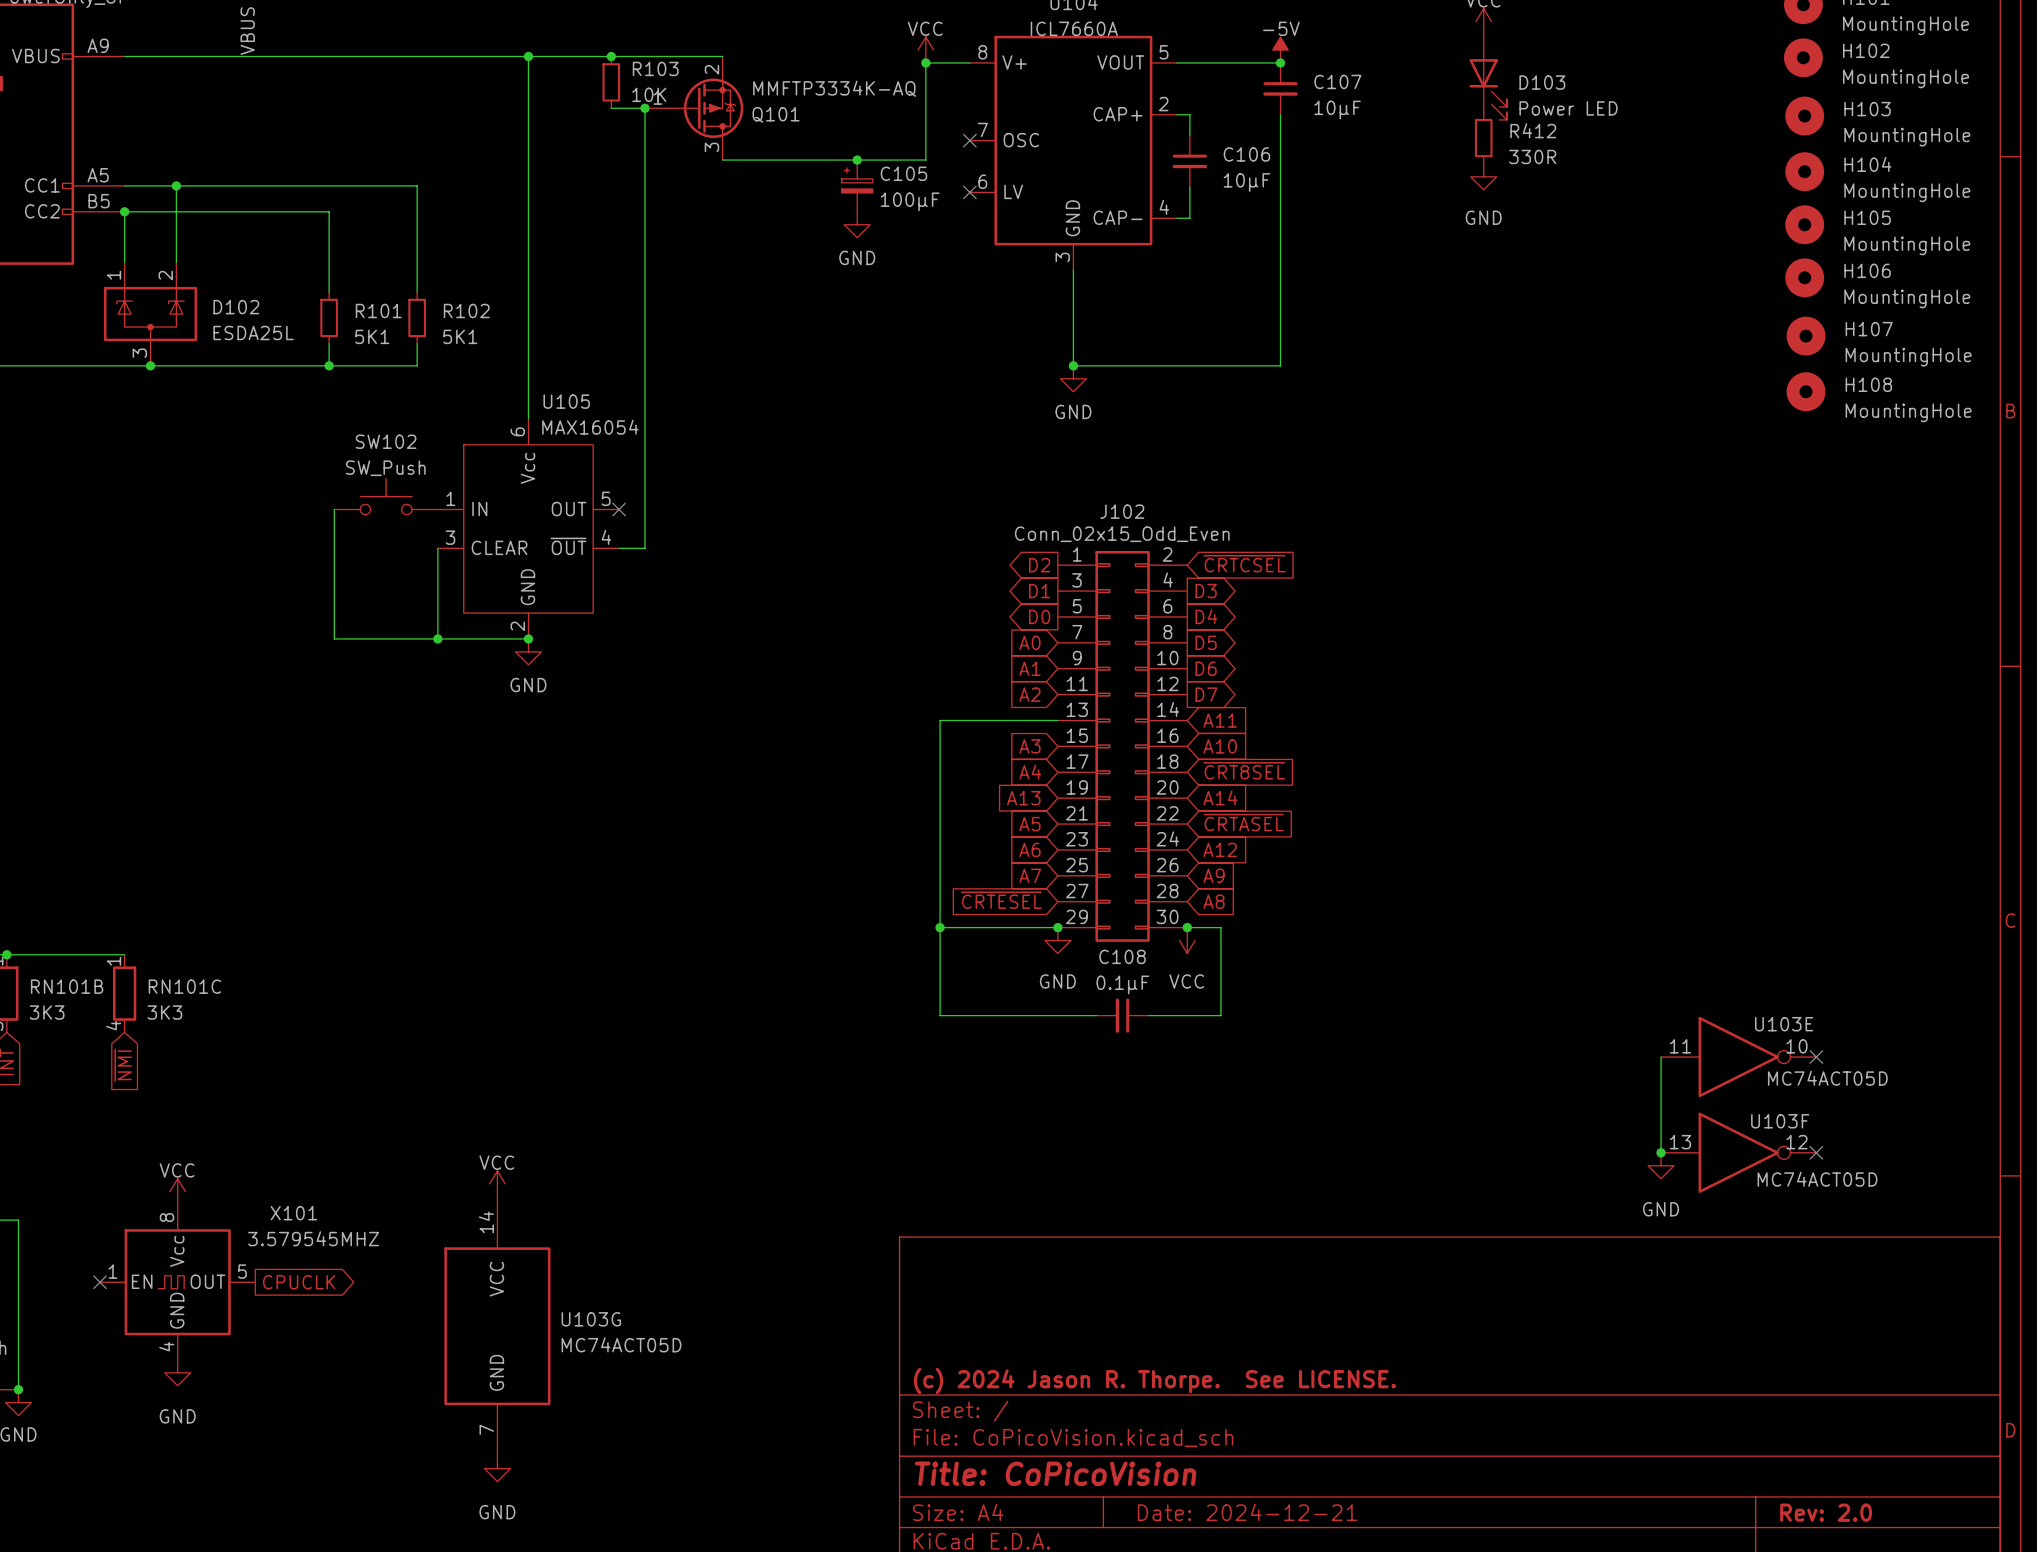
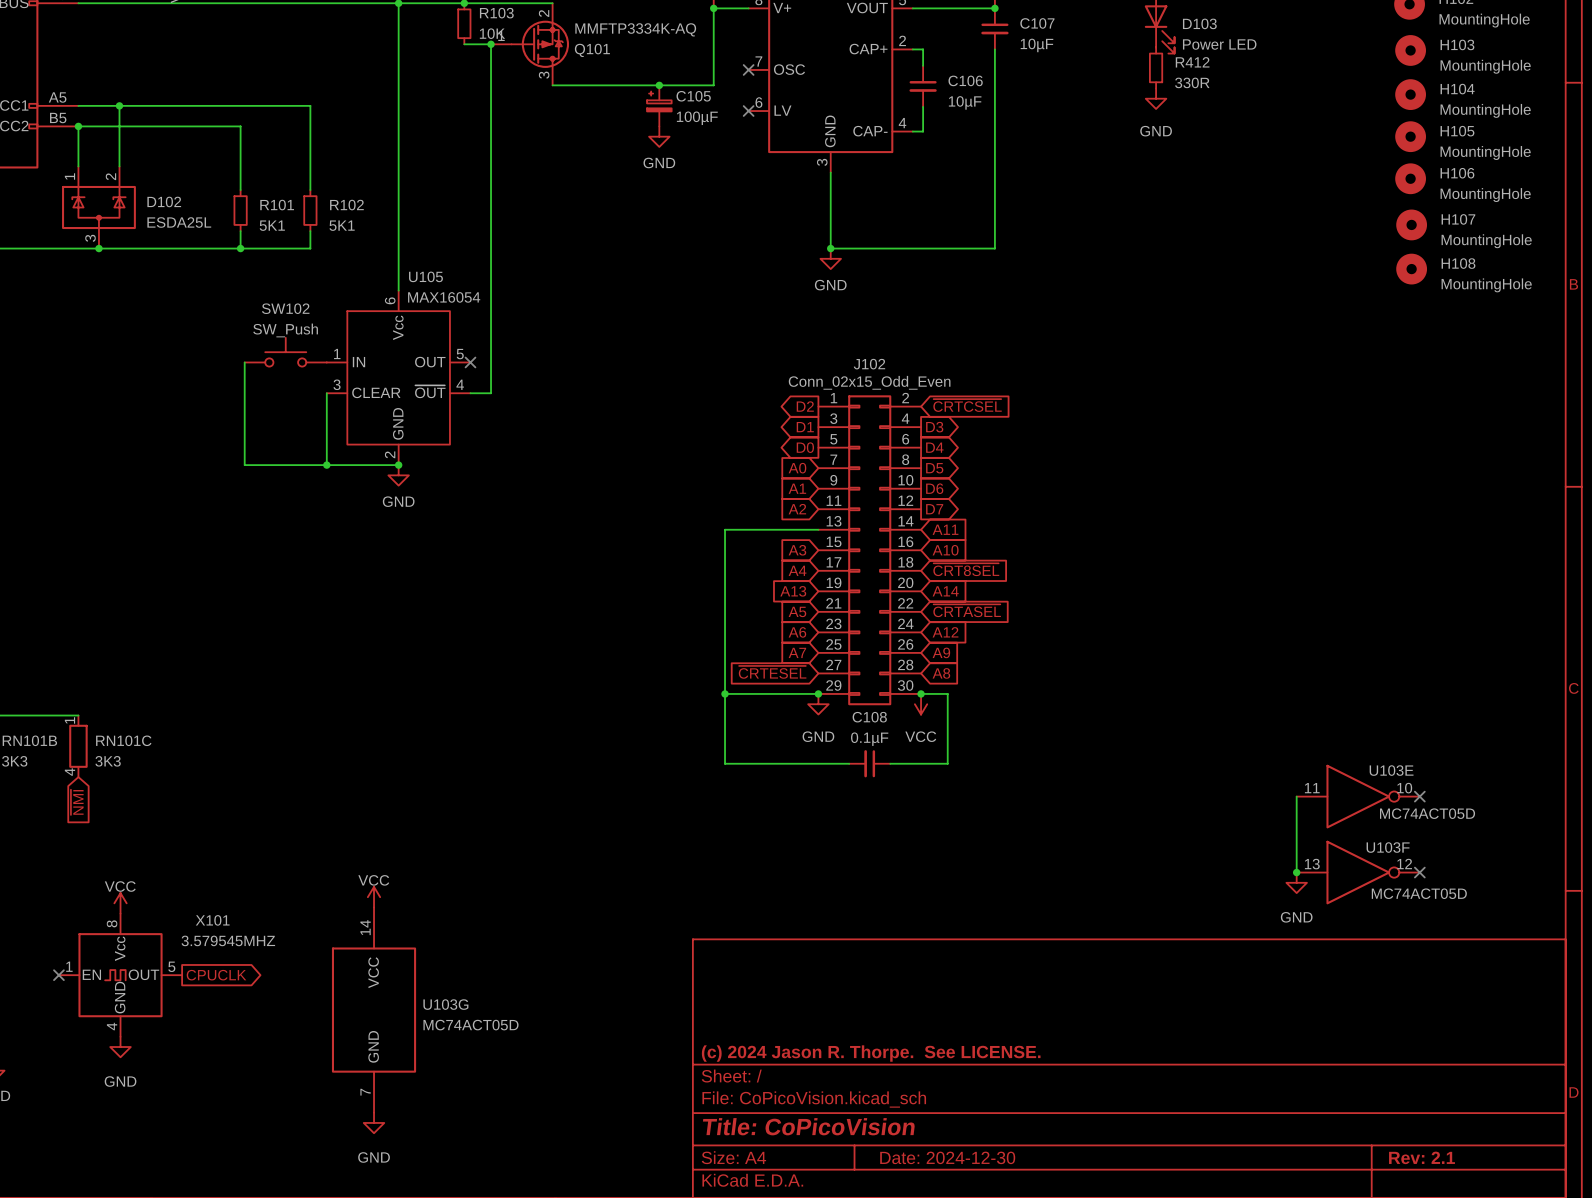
title block: Date: 2024-12-21 (1247, 1512) -> Date: 2024-12-30 (947, 1157)
title block: Rev: 2.0 (1826, 1512) -> Rev: 2.1 (1422, 1157)

